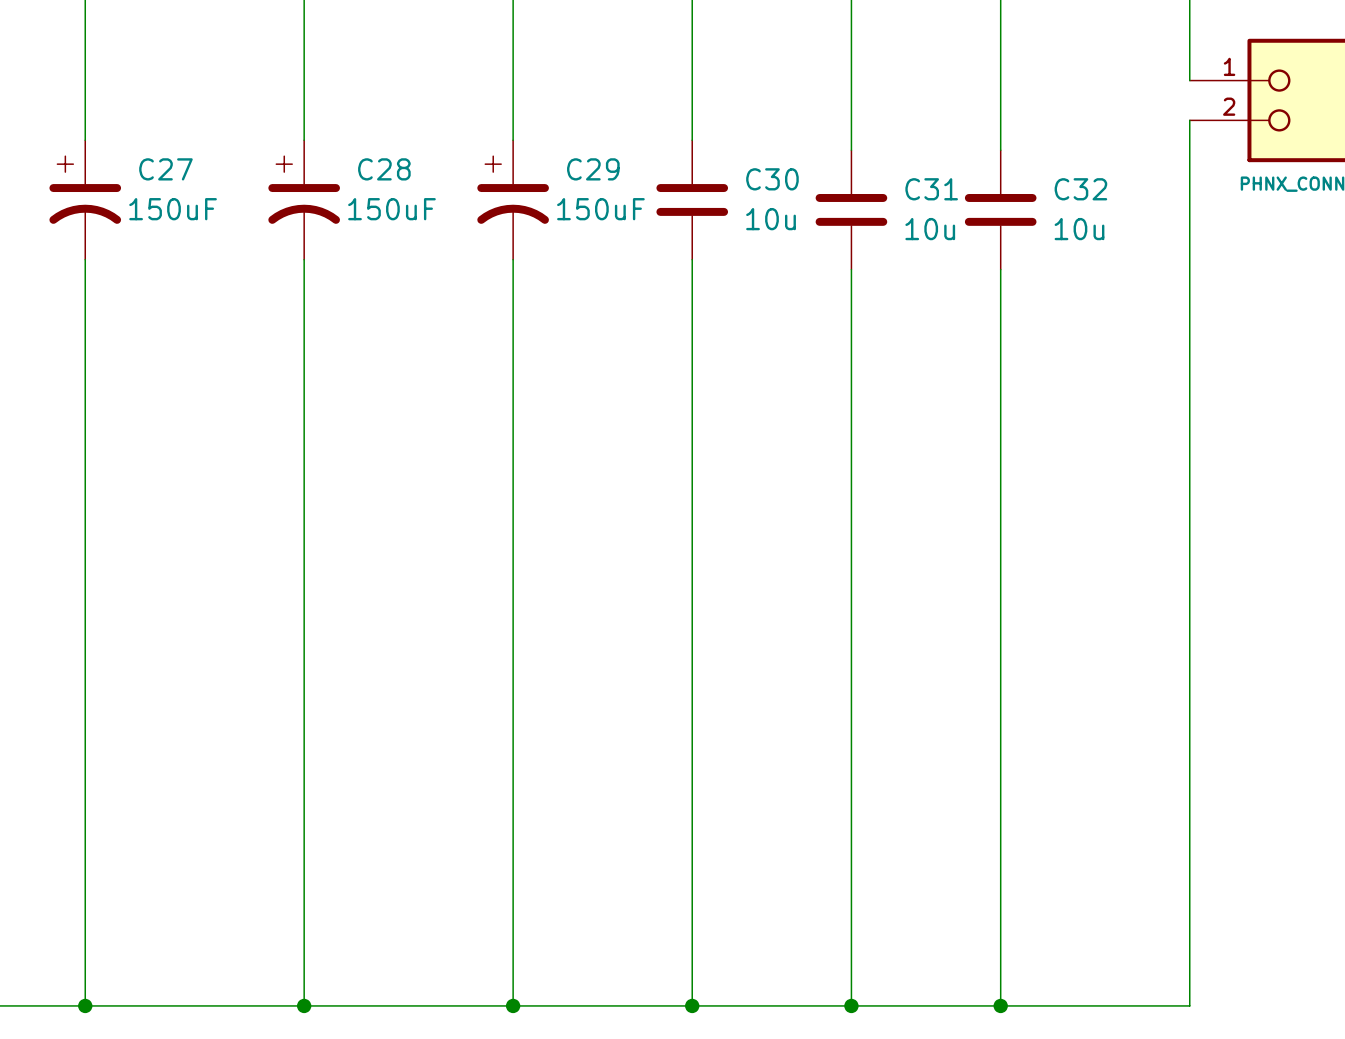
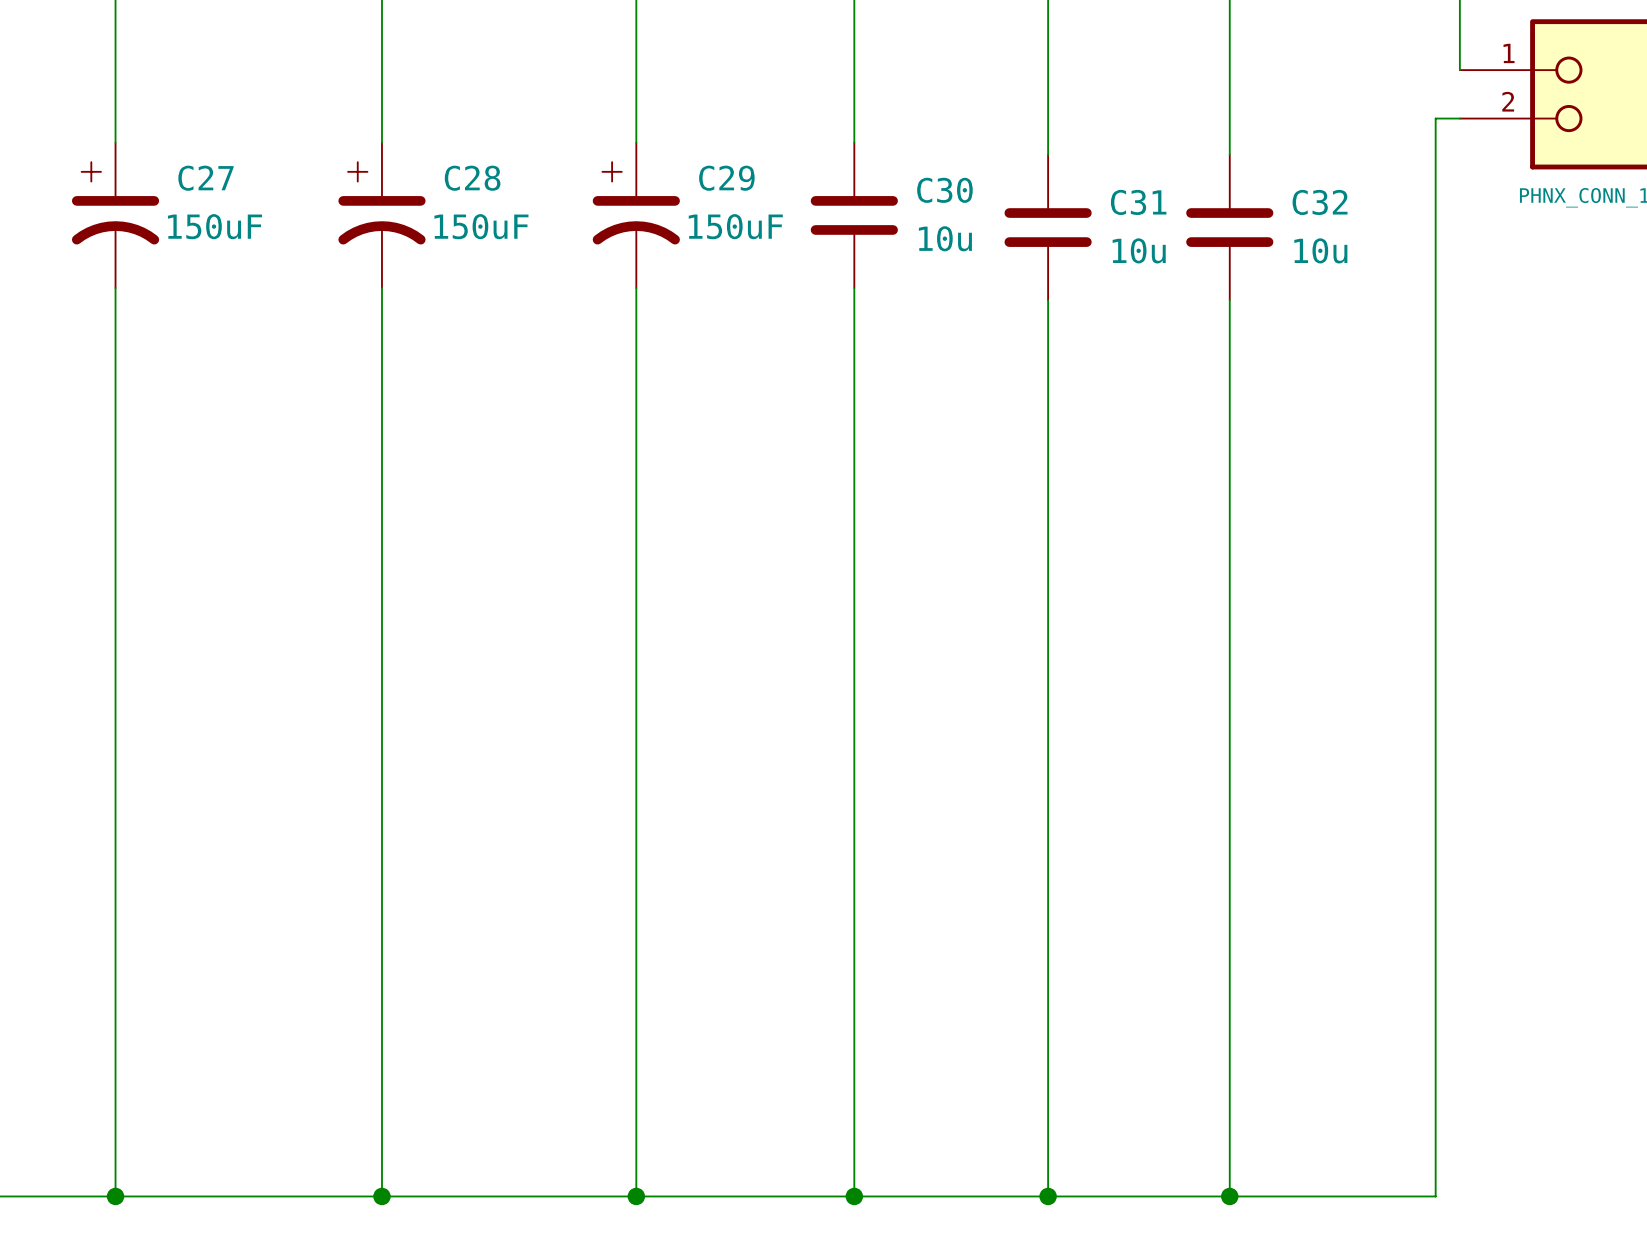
wire: (1189, 120) (1189, 1005) (1169, 1005) -> (1459, 118) (1435, 118) (1435, 1196)

